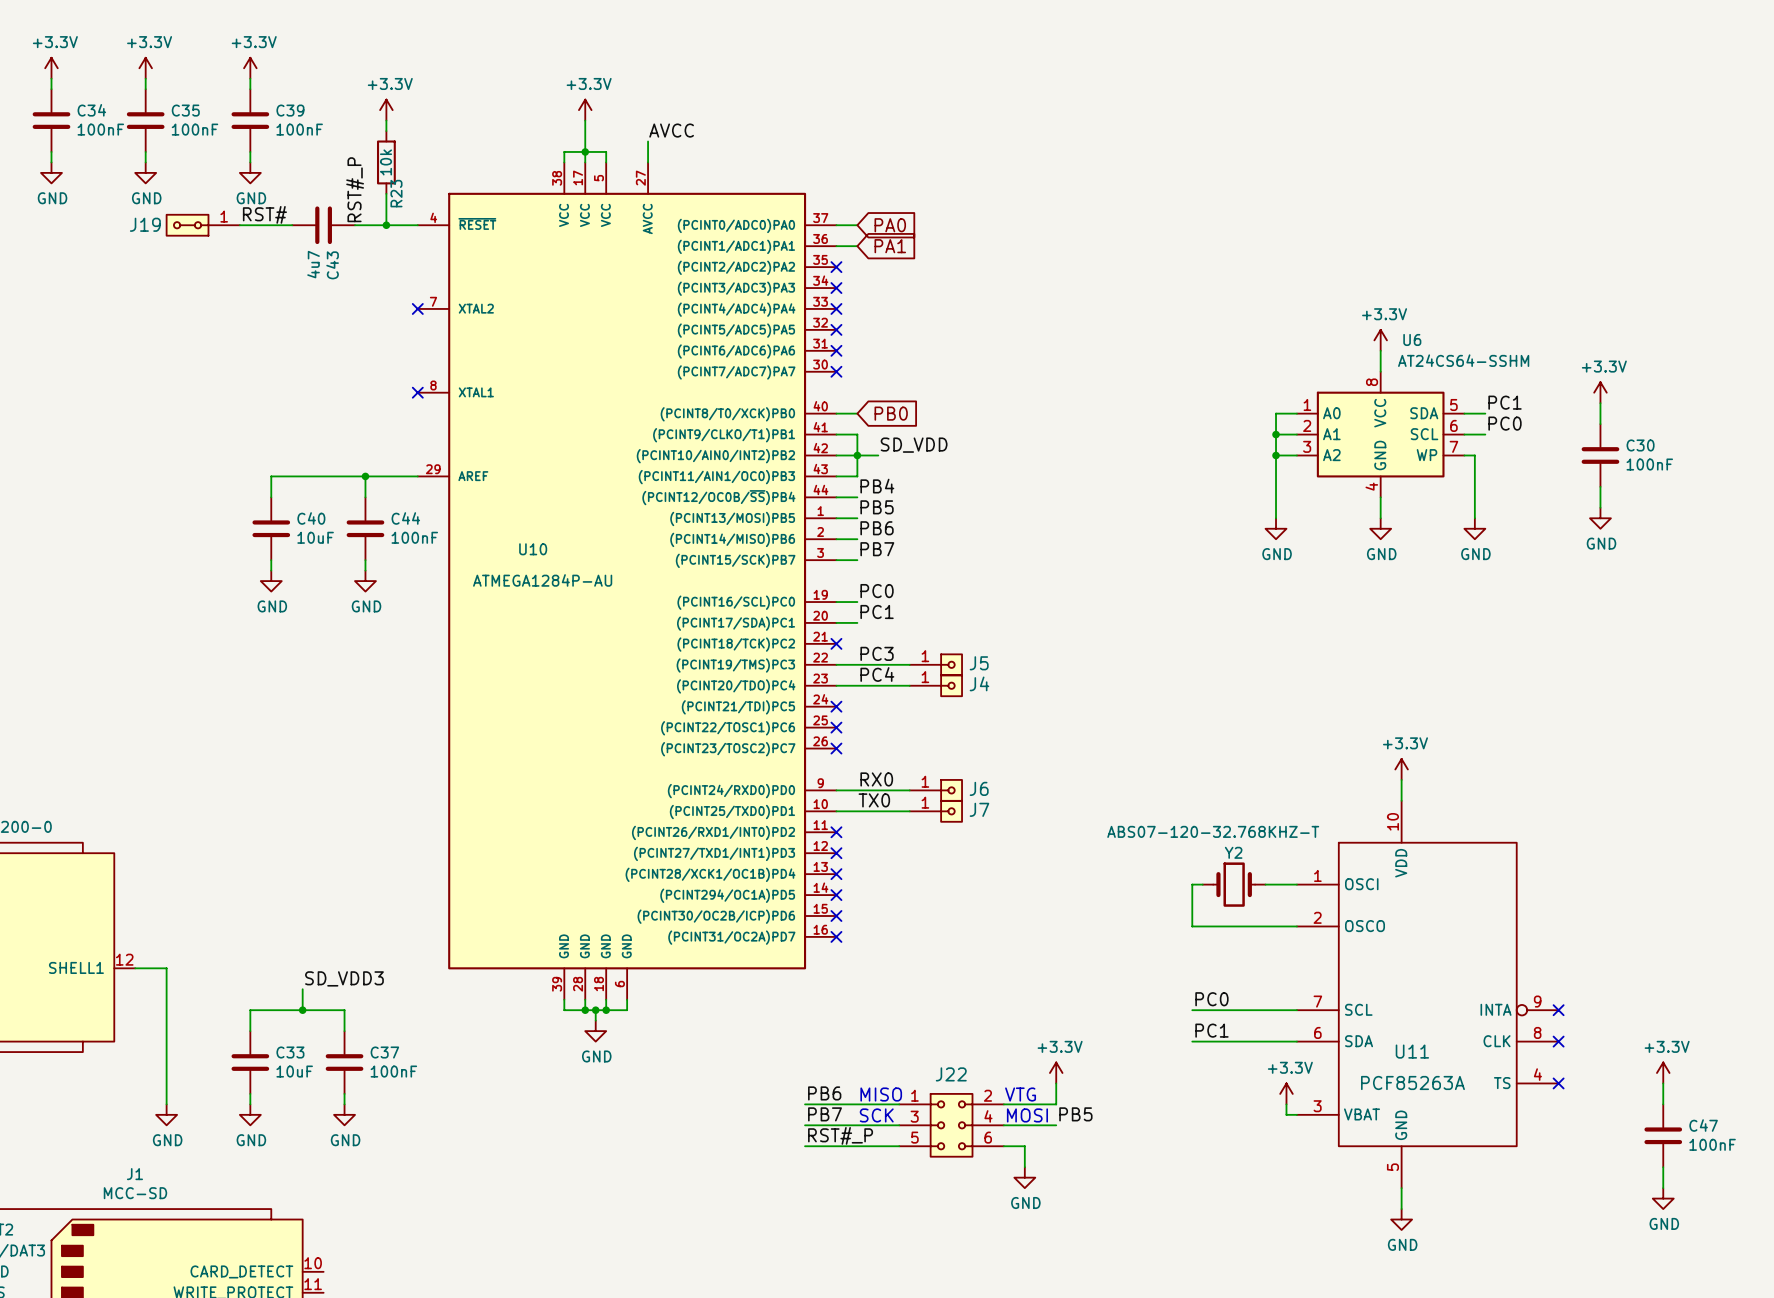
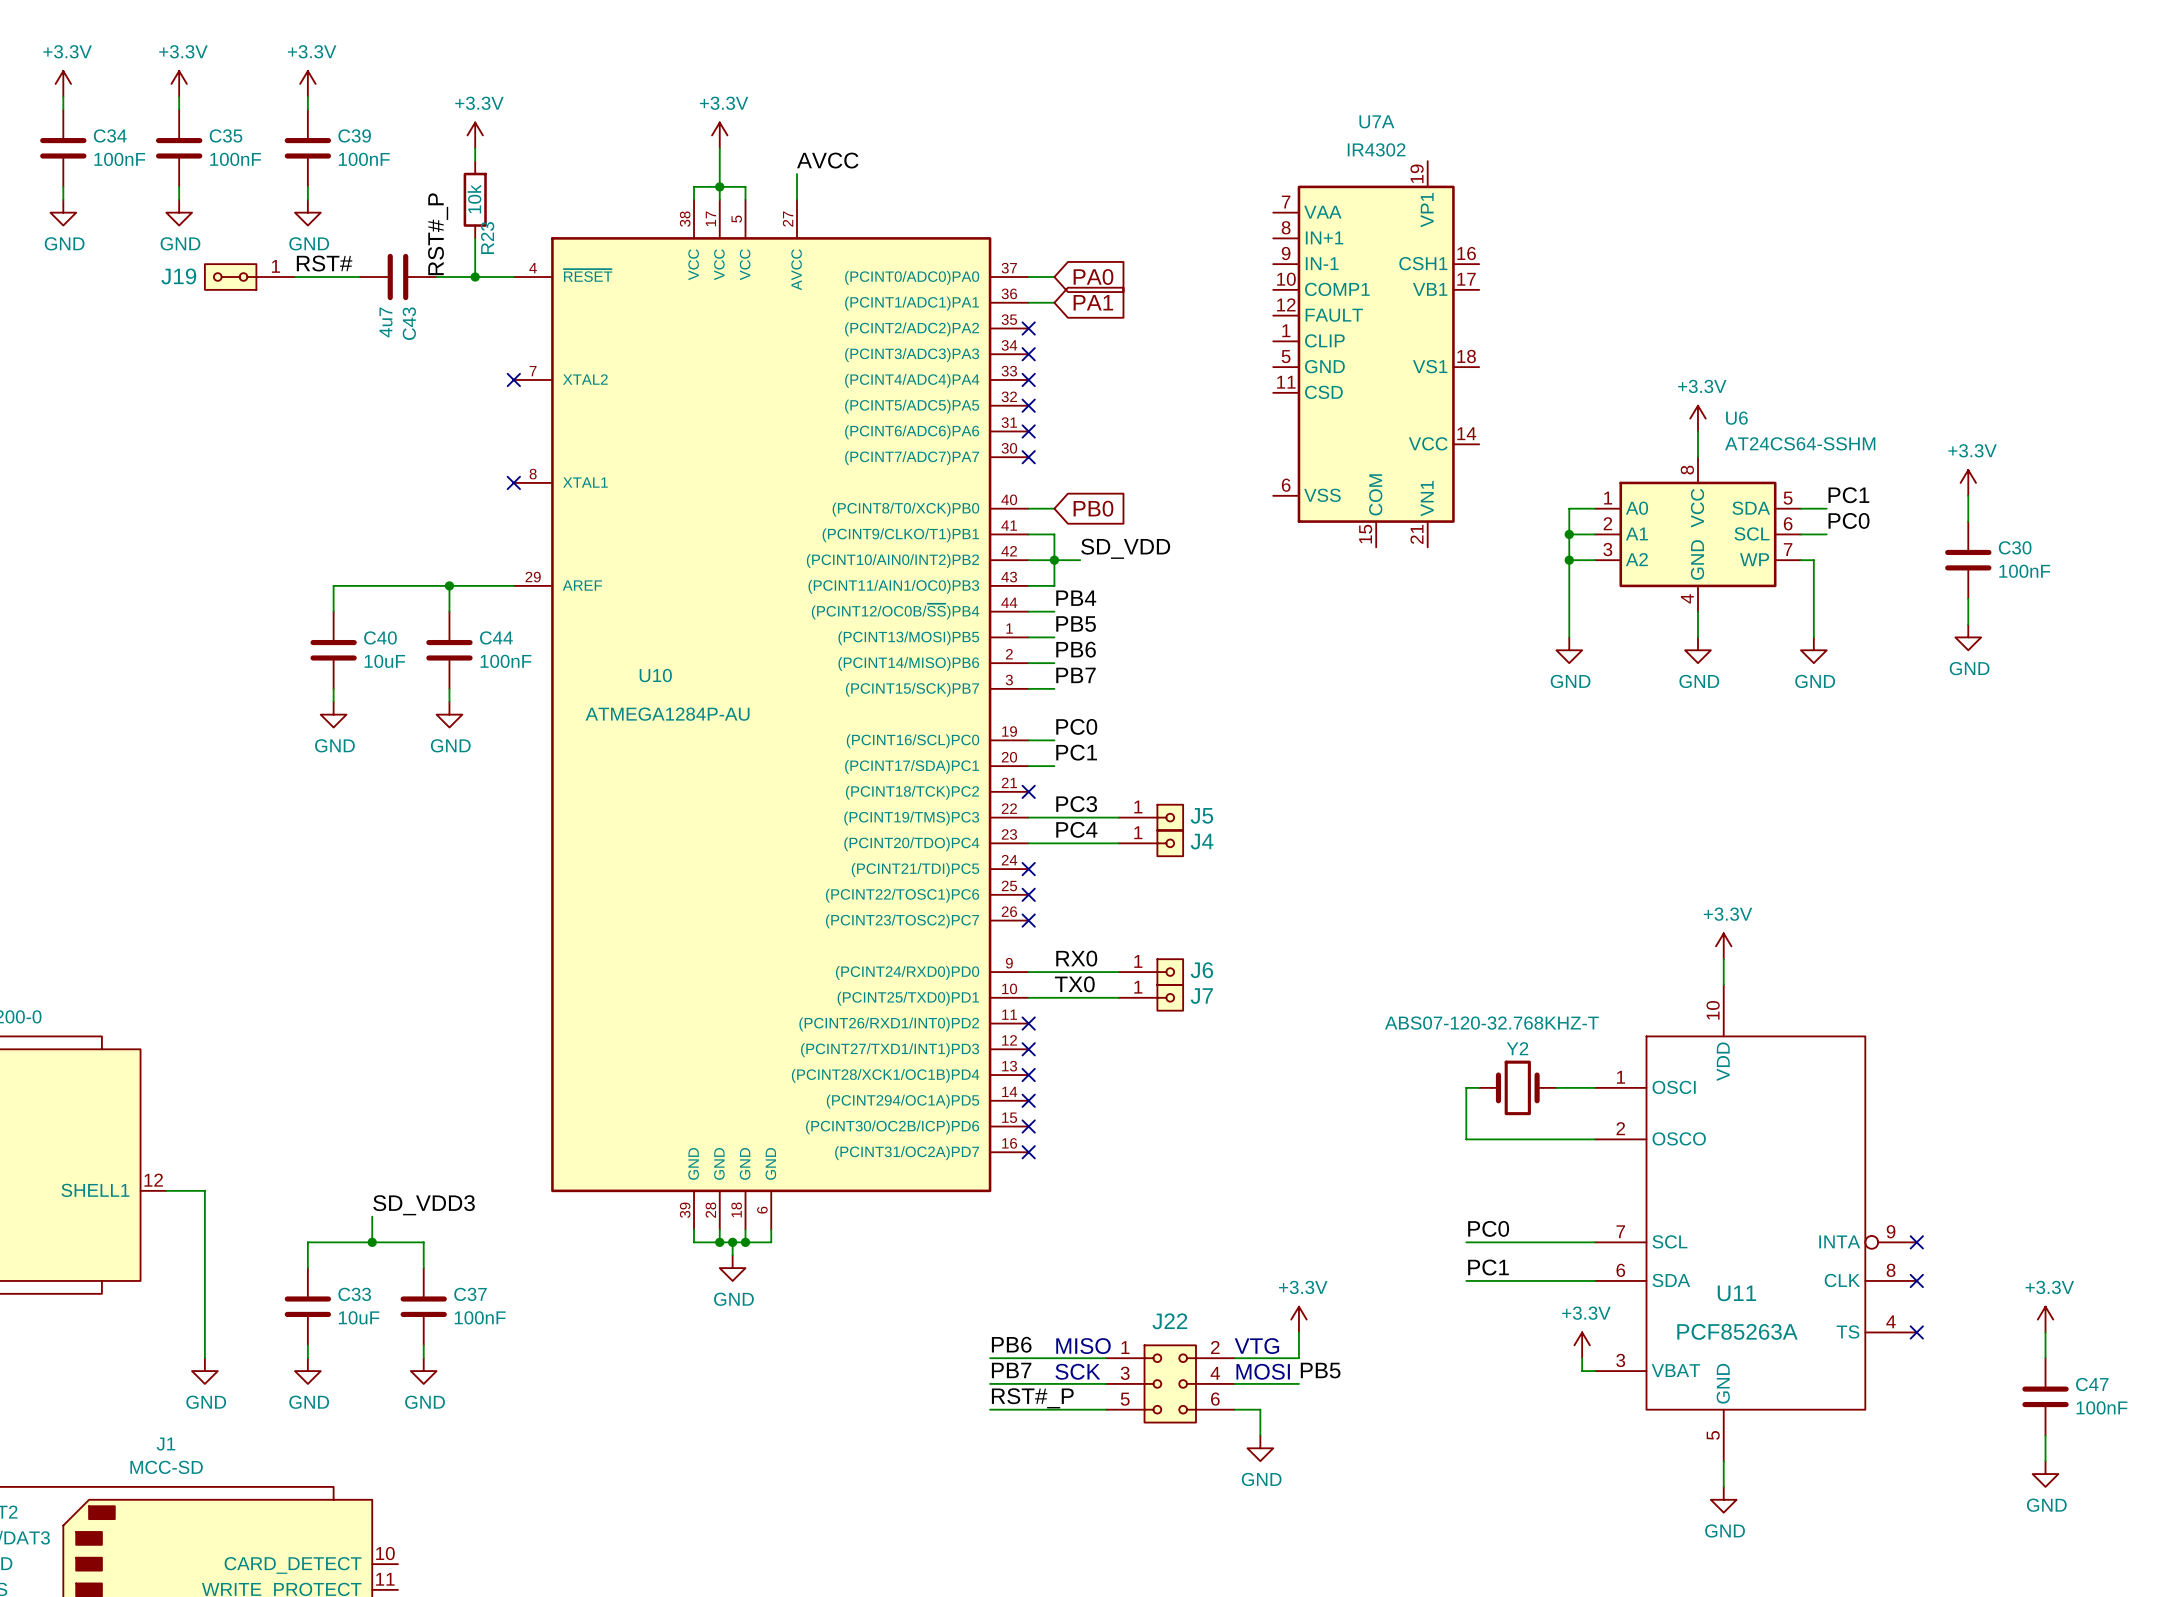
U7A: none -> IR4302 (1376, 354)

